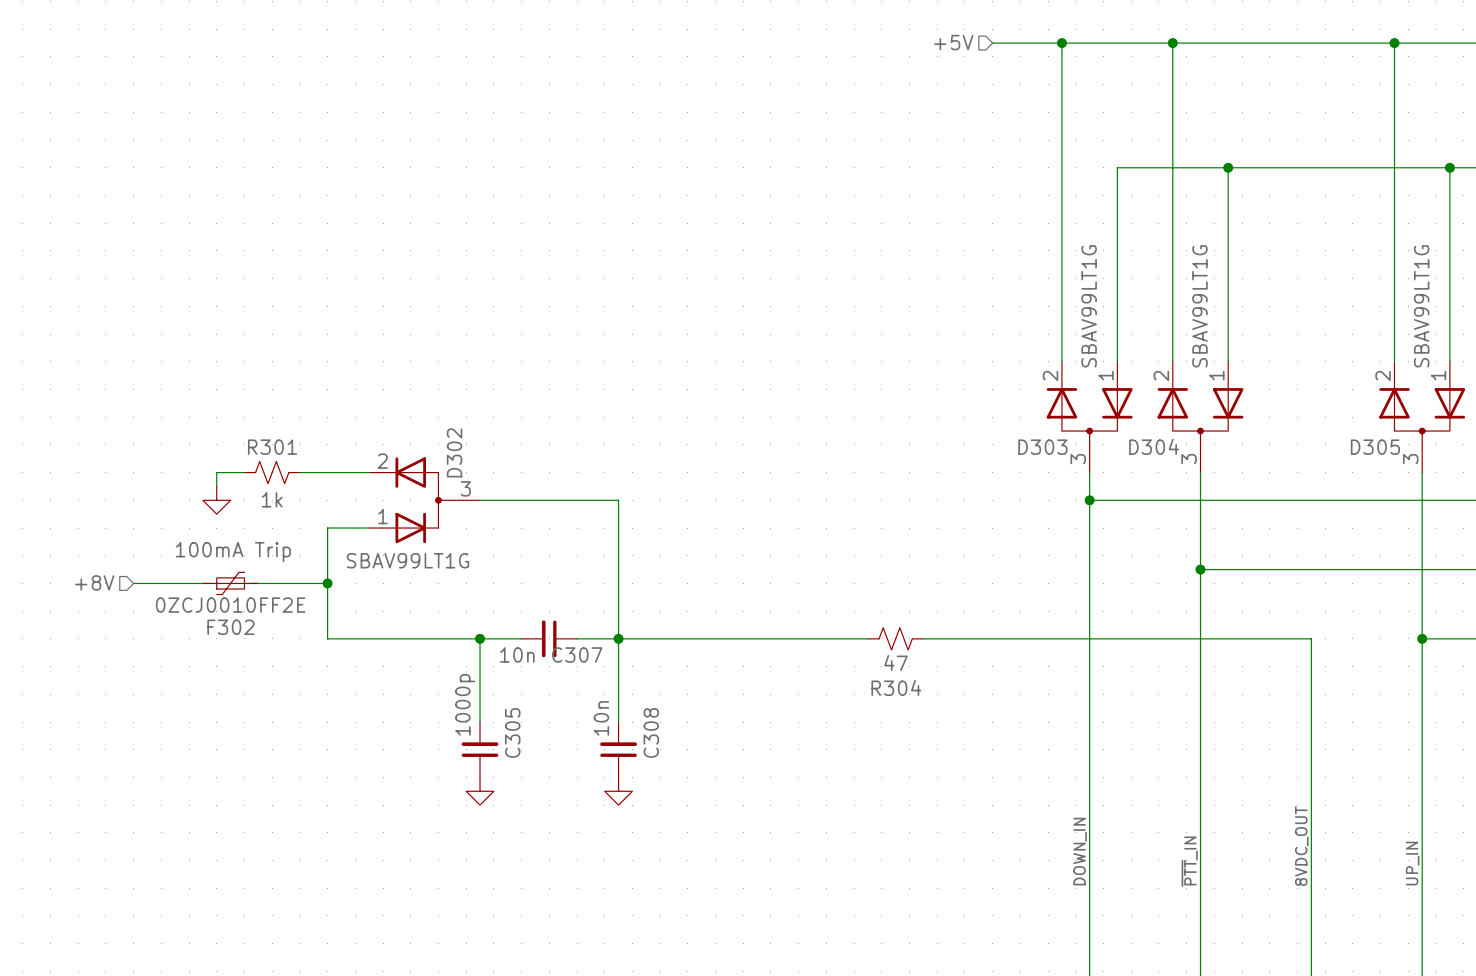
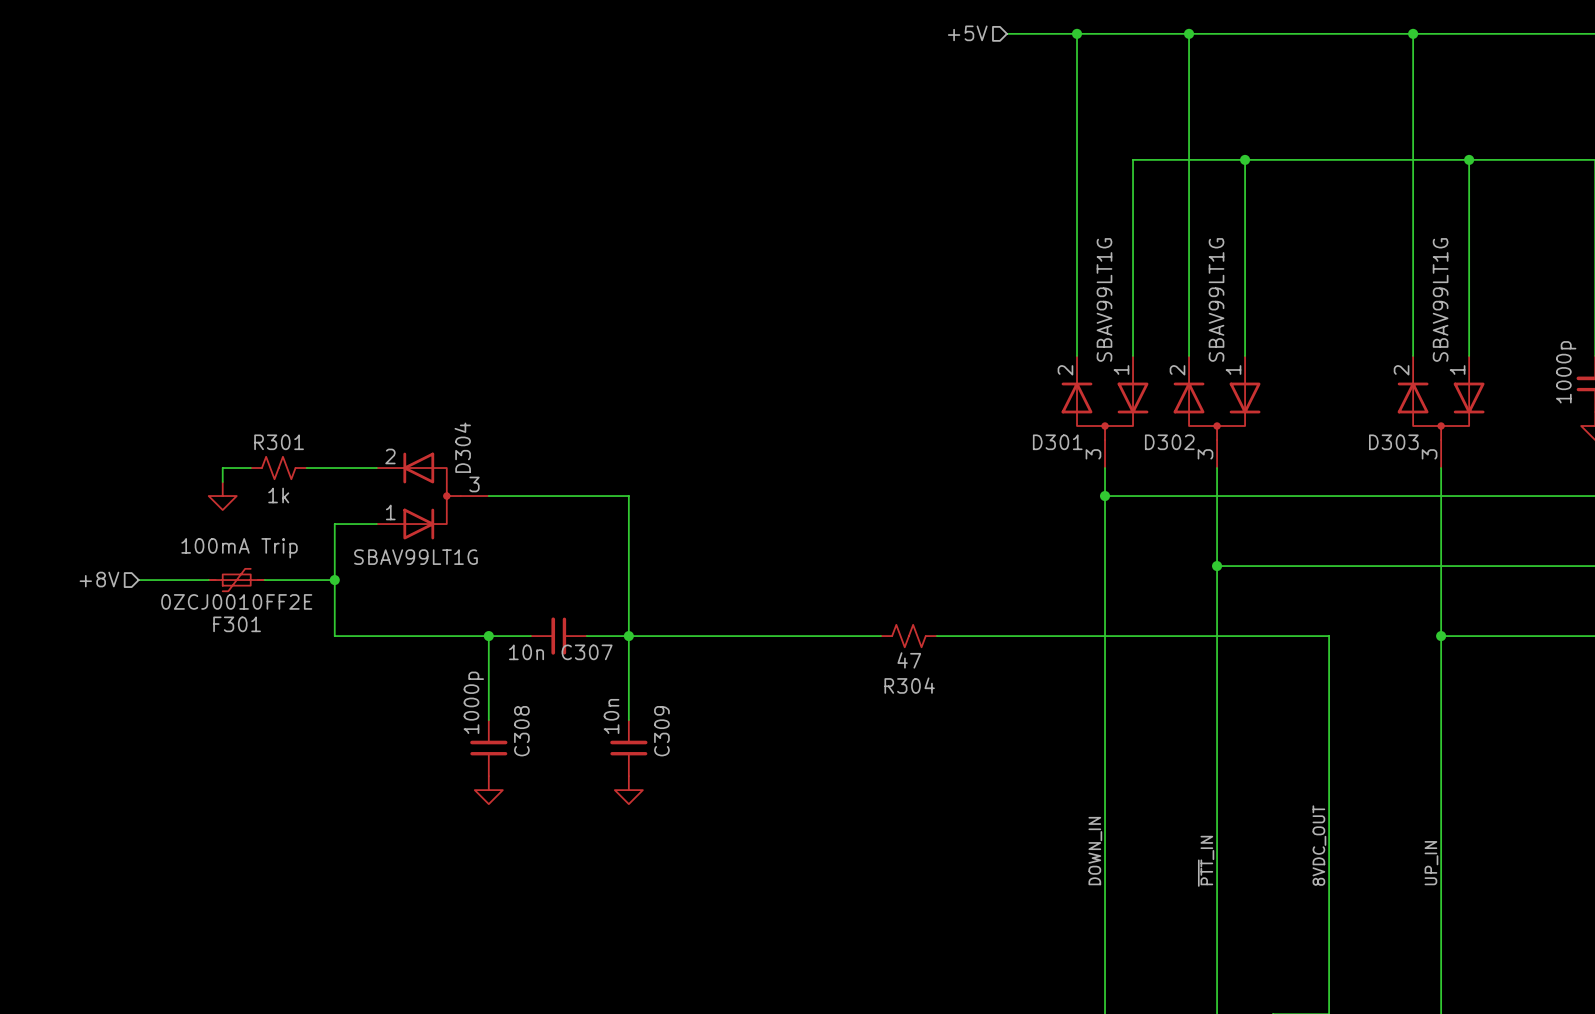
D304 name: D304 (1154, 446) -> D302 (1169, 442)
D303 name: D303 (1042, 447) -> D301 (1057, 442)
D305 name: D305 (1375, 447) -> D303 (1393, 442)
D302 name: D302 (454, 452) -> D304 (462, 447)
F302 name: F302 (230, 627) -> F301 (237, 624)
C305 name: C305 (512, 732) -> C308 (521, 731)
C308 name: C308 (651, 732) -> C309 (661, 731)

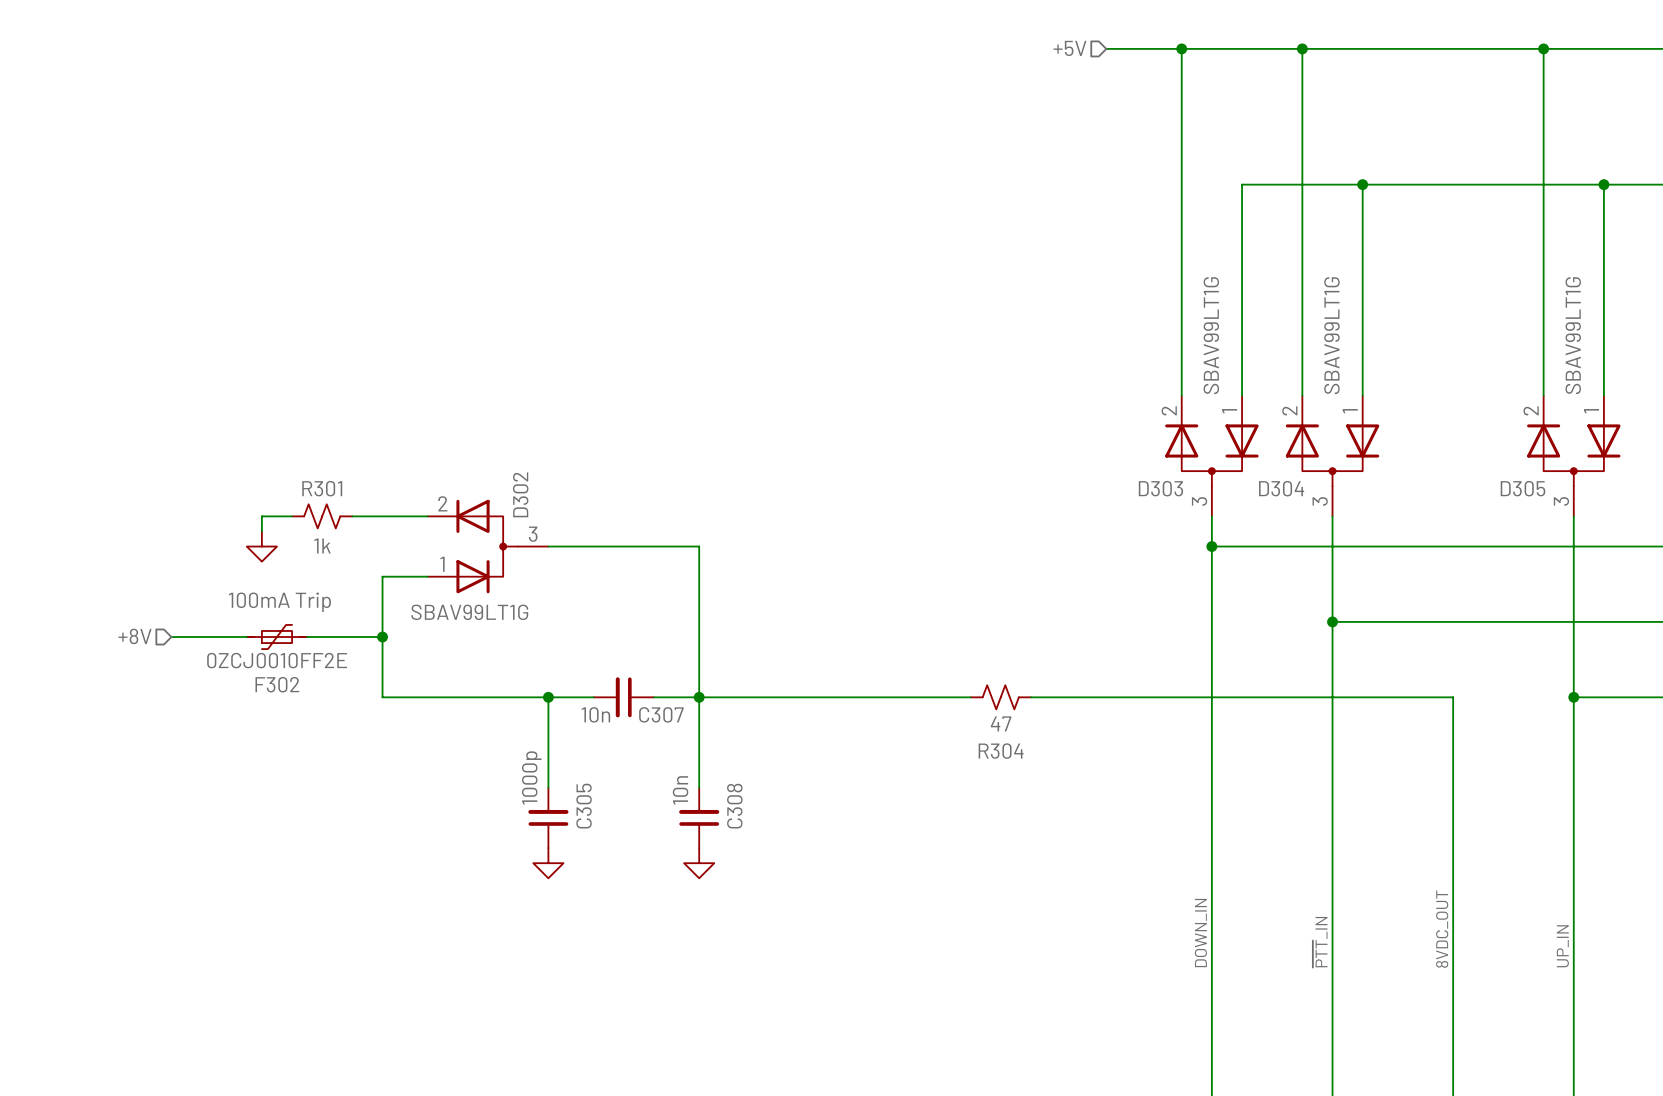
D301 name: D301 (1057, 442) -> D303 (1160, 488)
D302 name: D302 (1169, 442) -> D304 (1281, 488)
D303 name: D303 (1393, 442) -> D305 (1522, 488)
D304 name: D304 (462, 447) -> D302 (520, 494)
F301 name: F301 (237, 624) -> F302 (277, 684)
C308 name: C308 (521, 731) -> C305 (584, 806)
C309 name: C309 (661, 731) -> C308 (734, 806)

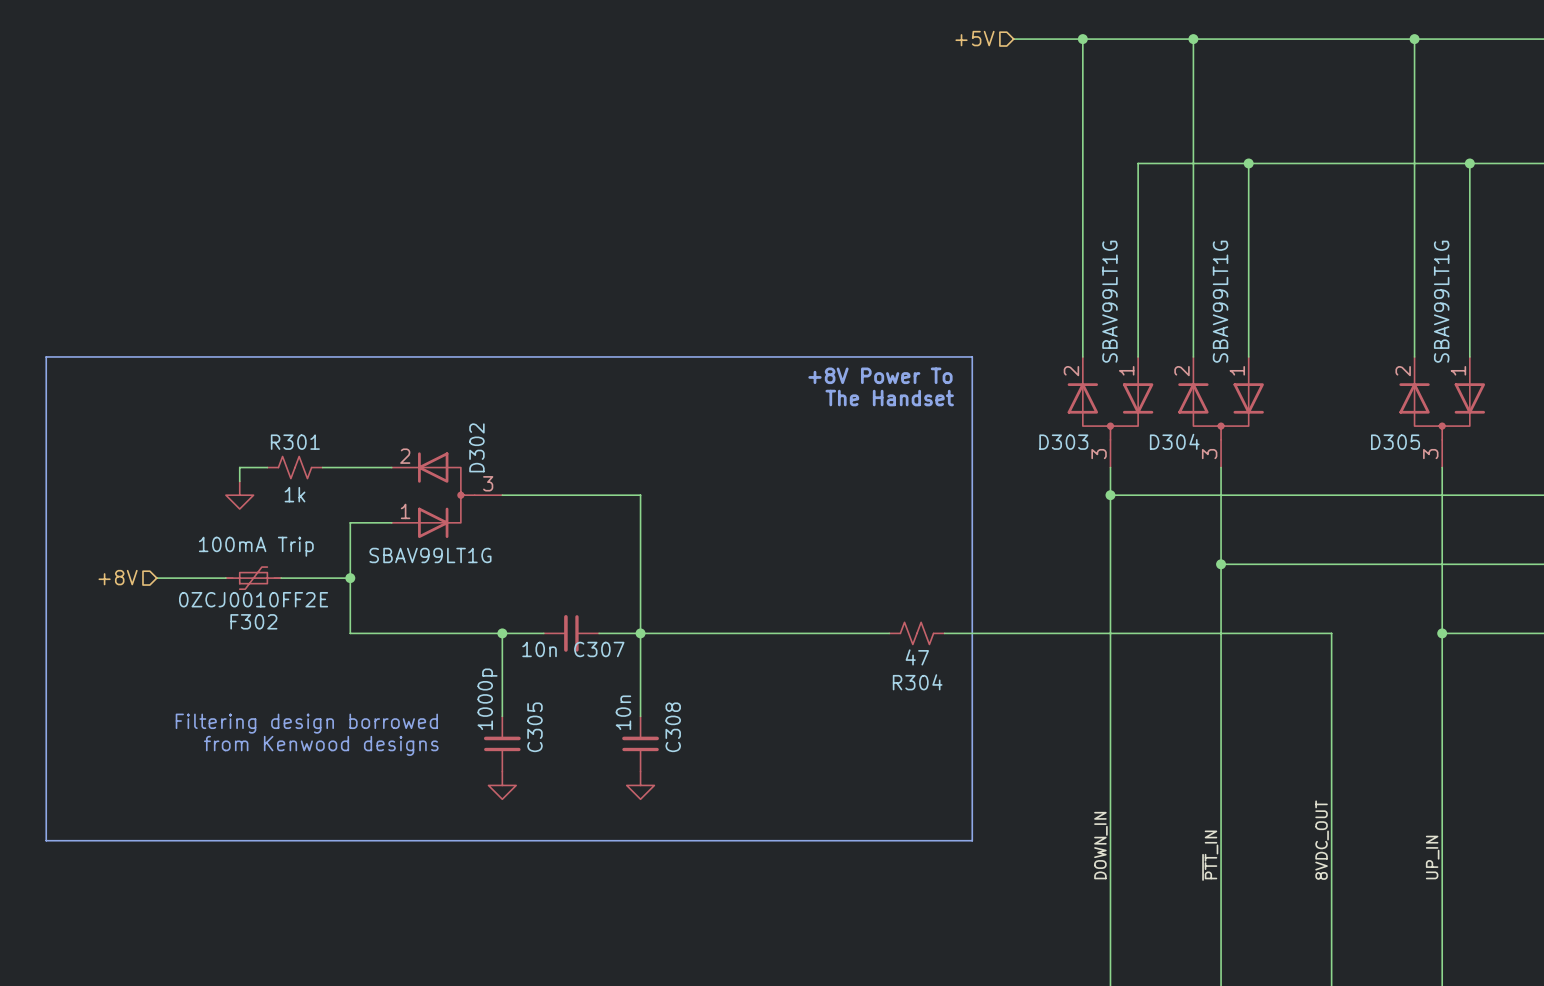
line: none -> (46, 356) (972, 356) (972, 840) (46, 840) (46, 356)
text: none -> +8V Power To (880, 375)
text: none -> The Handset (889, 398)
text: none -> Filtering design borrowed (306, 723)
text: none -> from Kenwood designs (321, 745)

